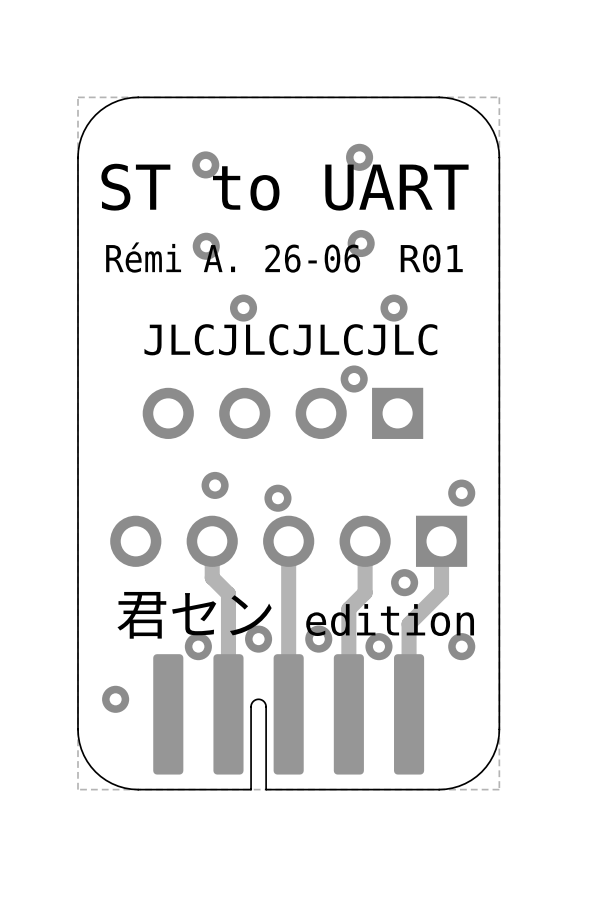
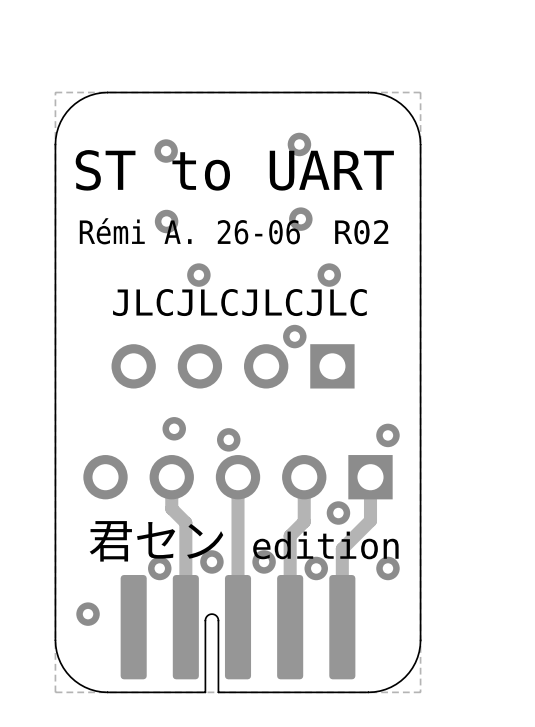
text: R01 (431, 258) -> R02 (361, 232)

